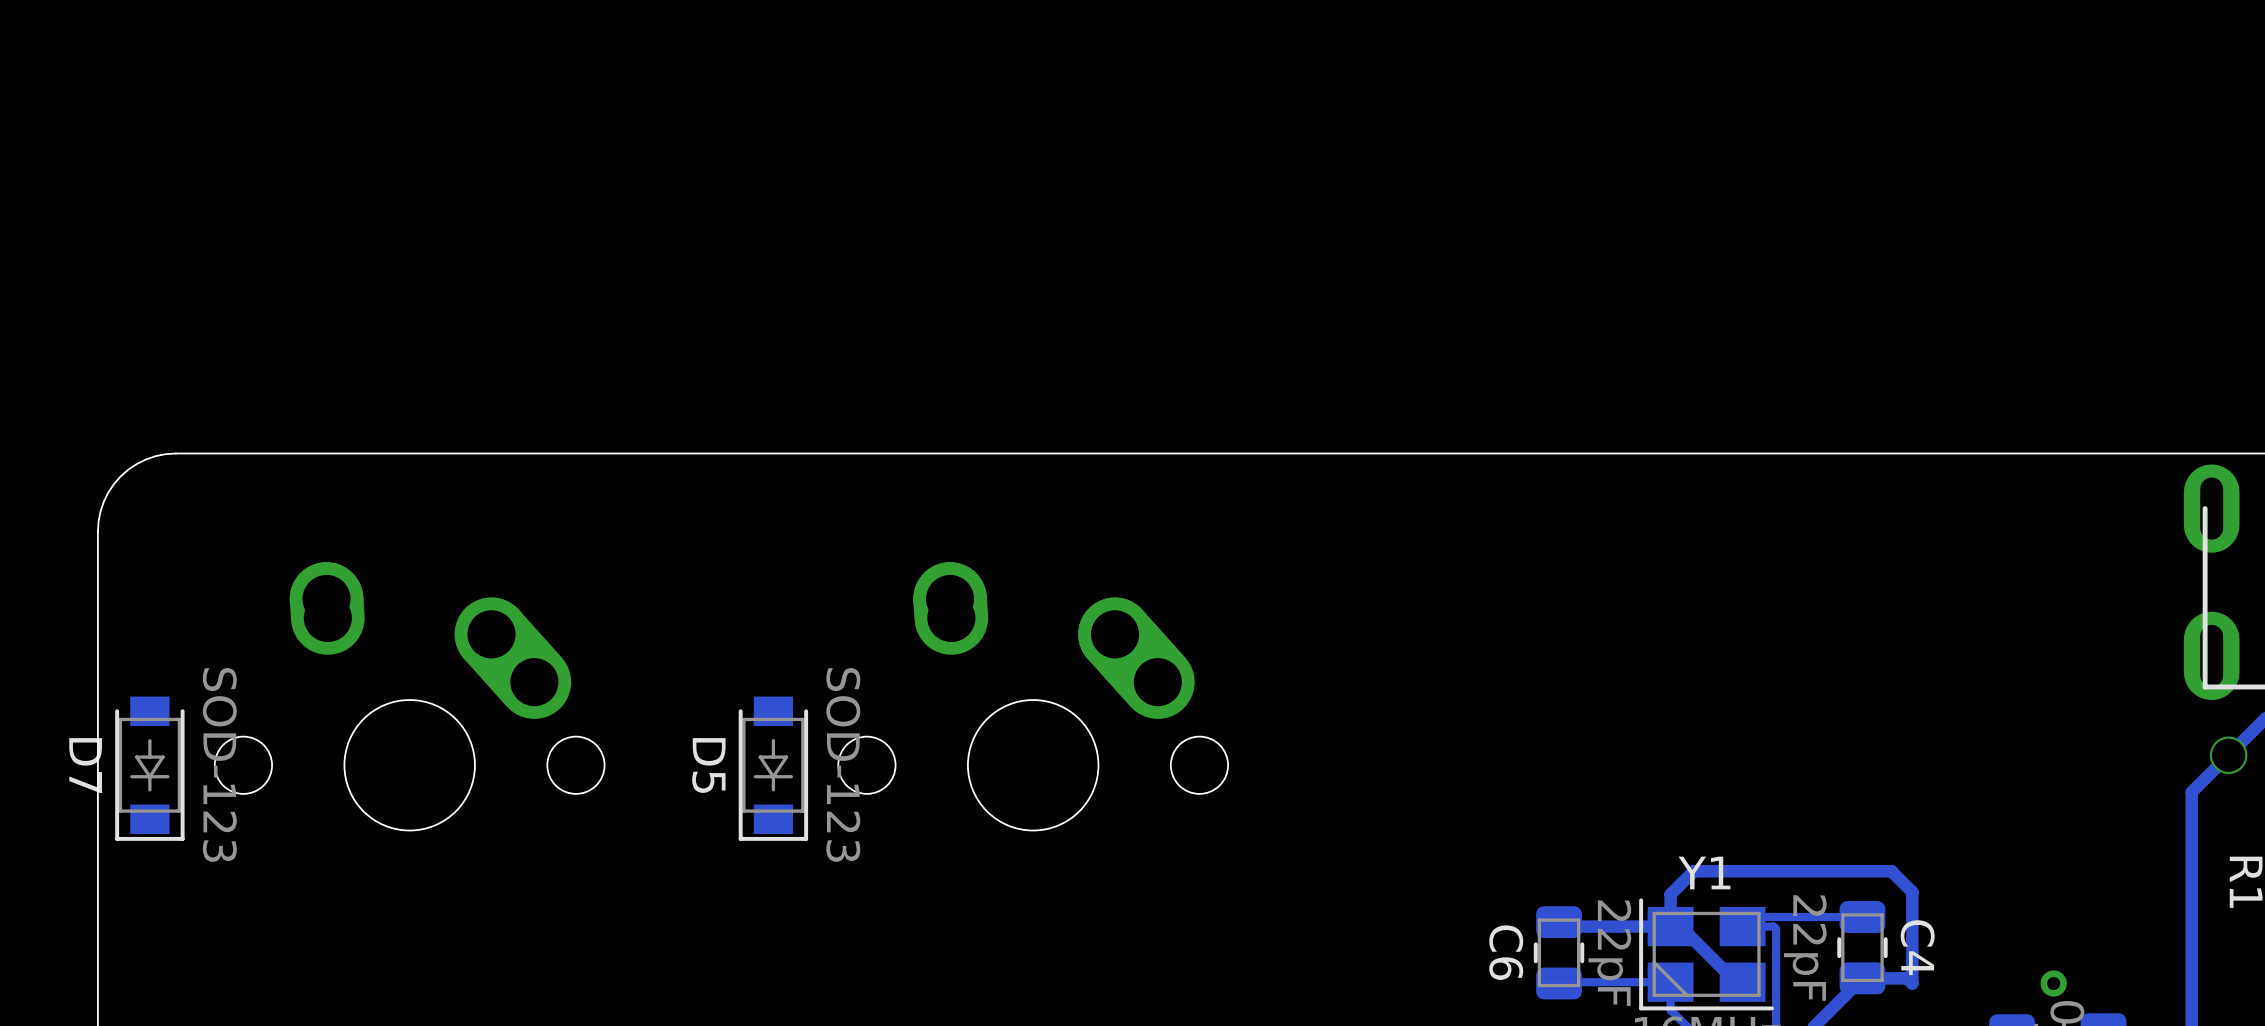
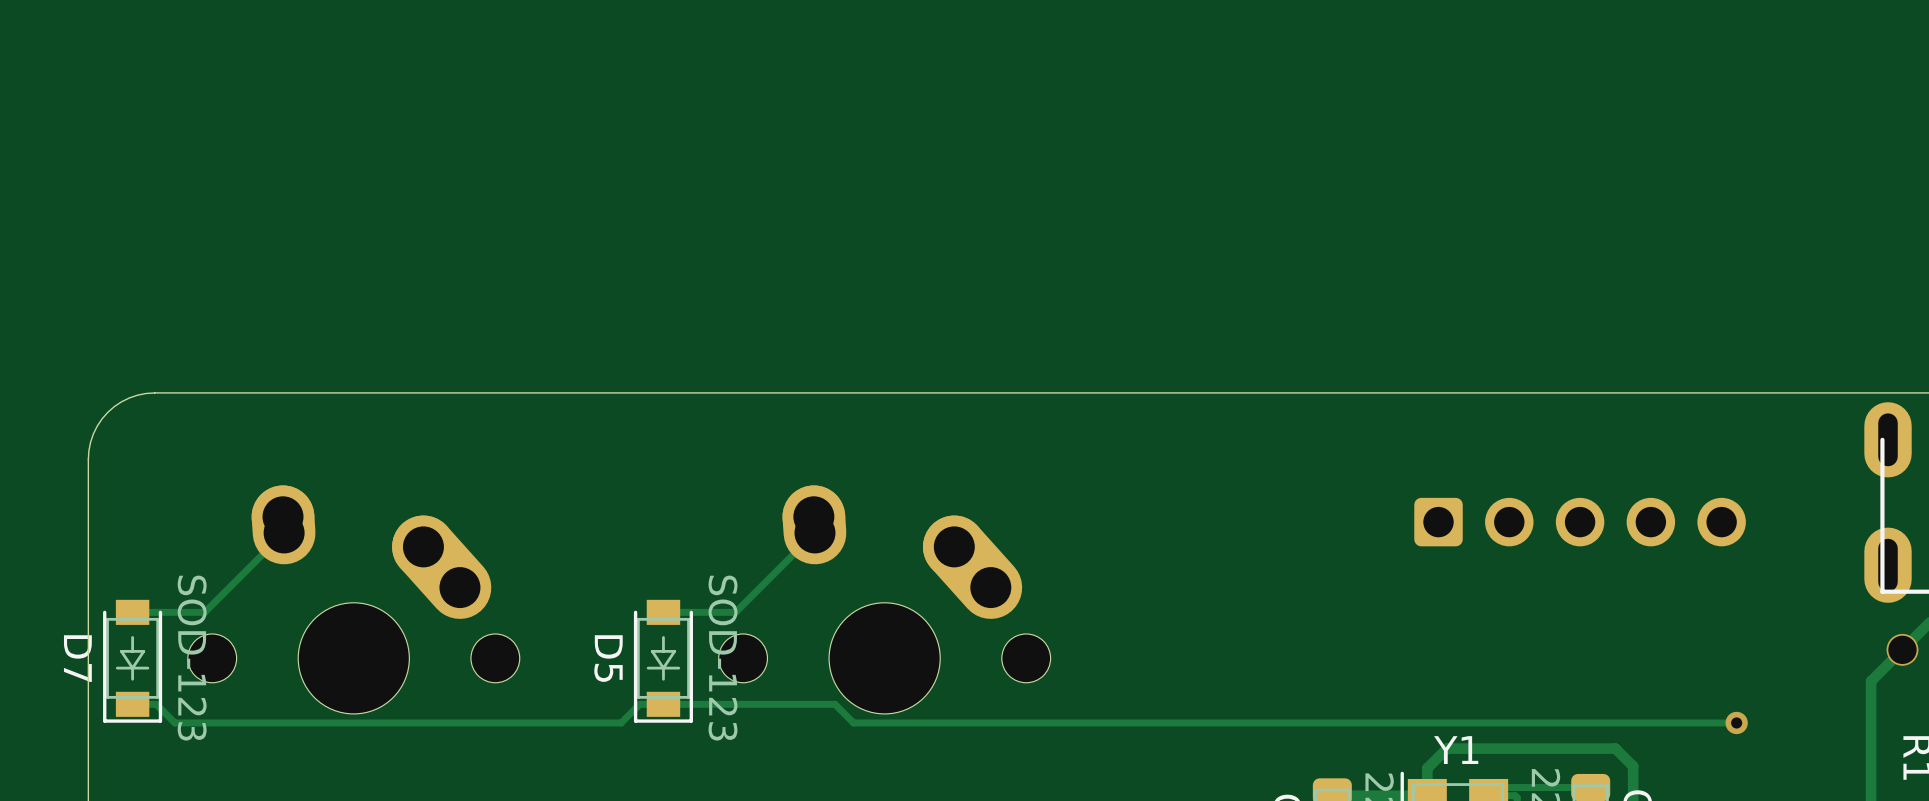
part: none -> (1580, 522)
track: none -> (284, 532) (204, 612) (132, 612)
track: none -> (814, 532) (735, 612) (663, 612)
track: none -> (132, 704) (156, 704) (174, 722) (621, 722) (639, 704) (834, 704) (853, 722) (1736, 722)
via: none -> (1736, 722)

